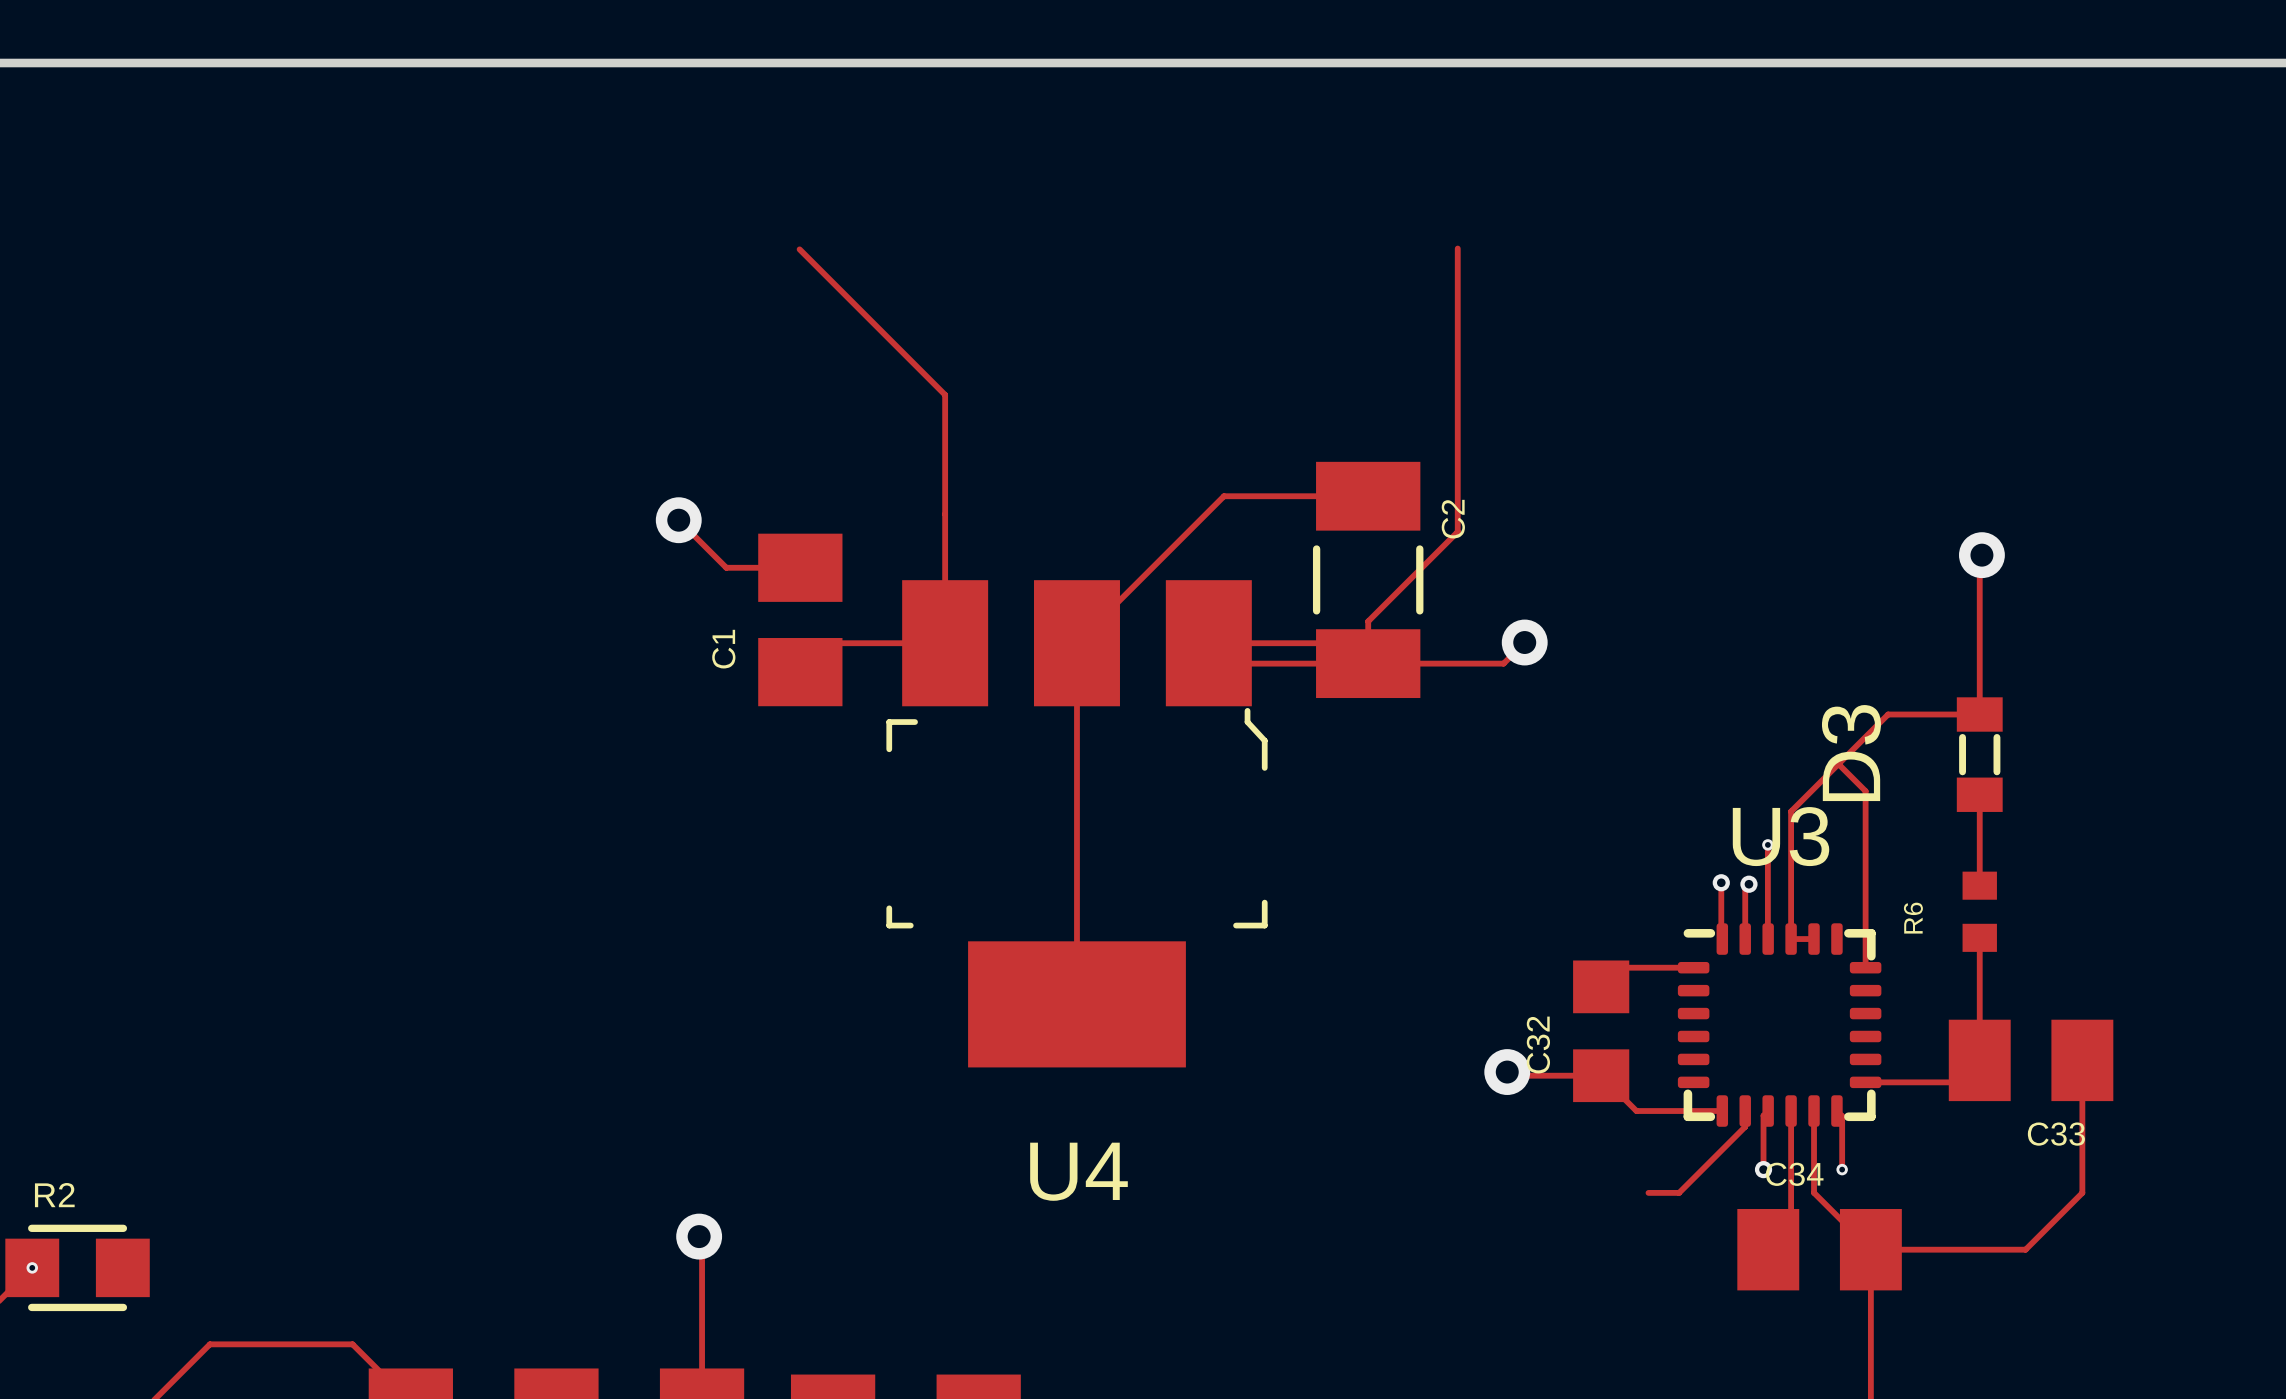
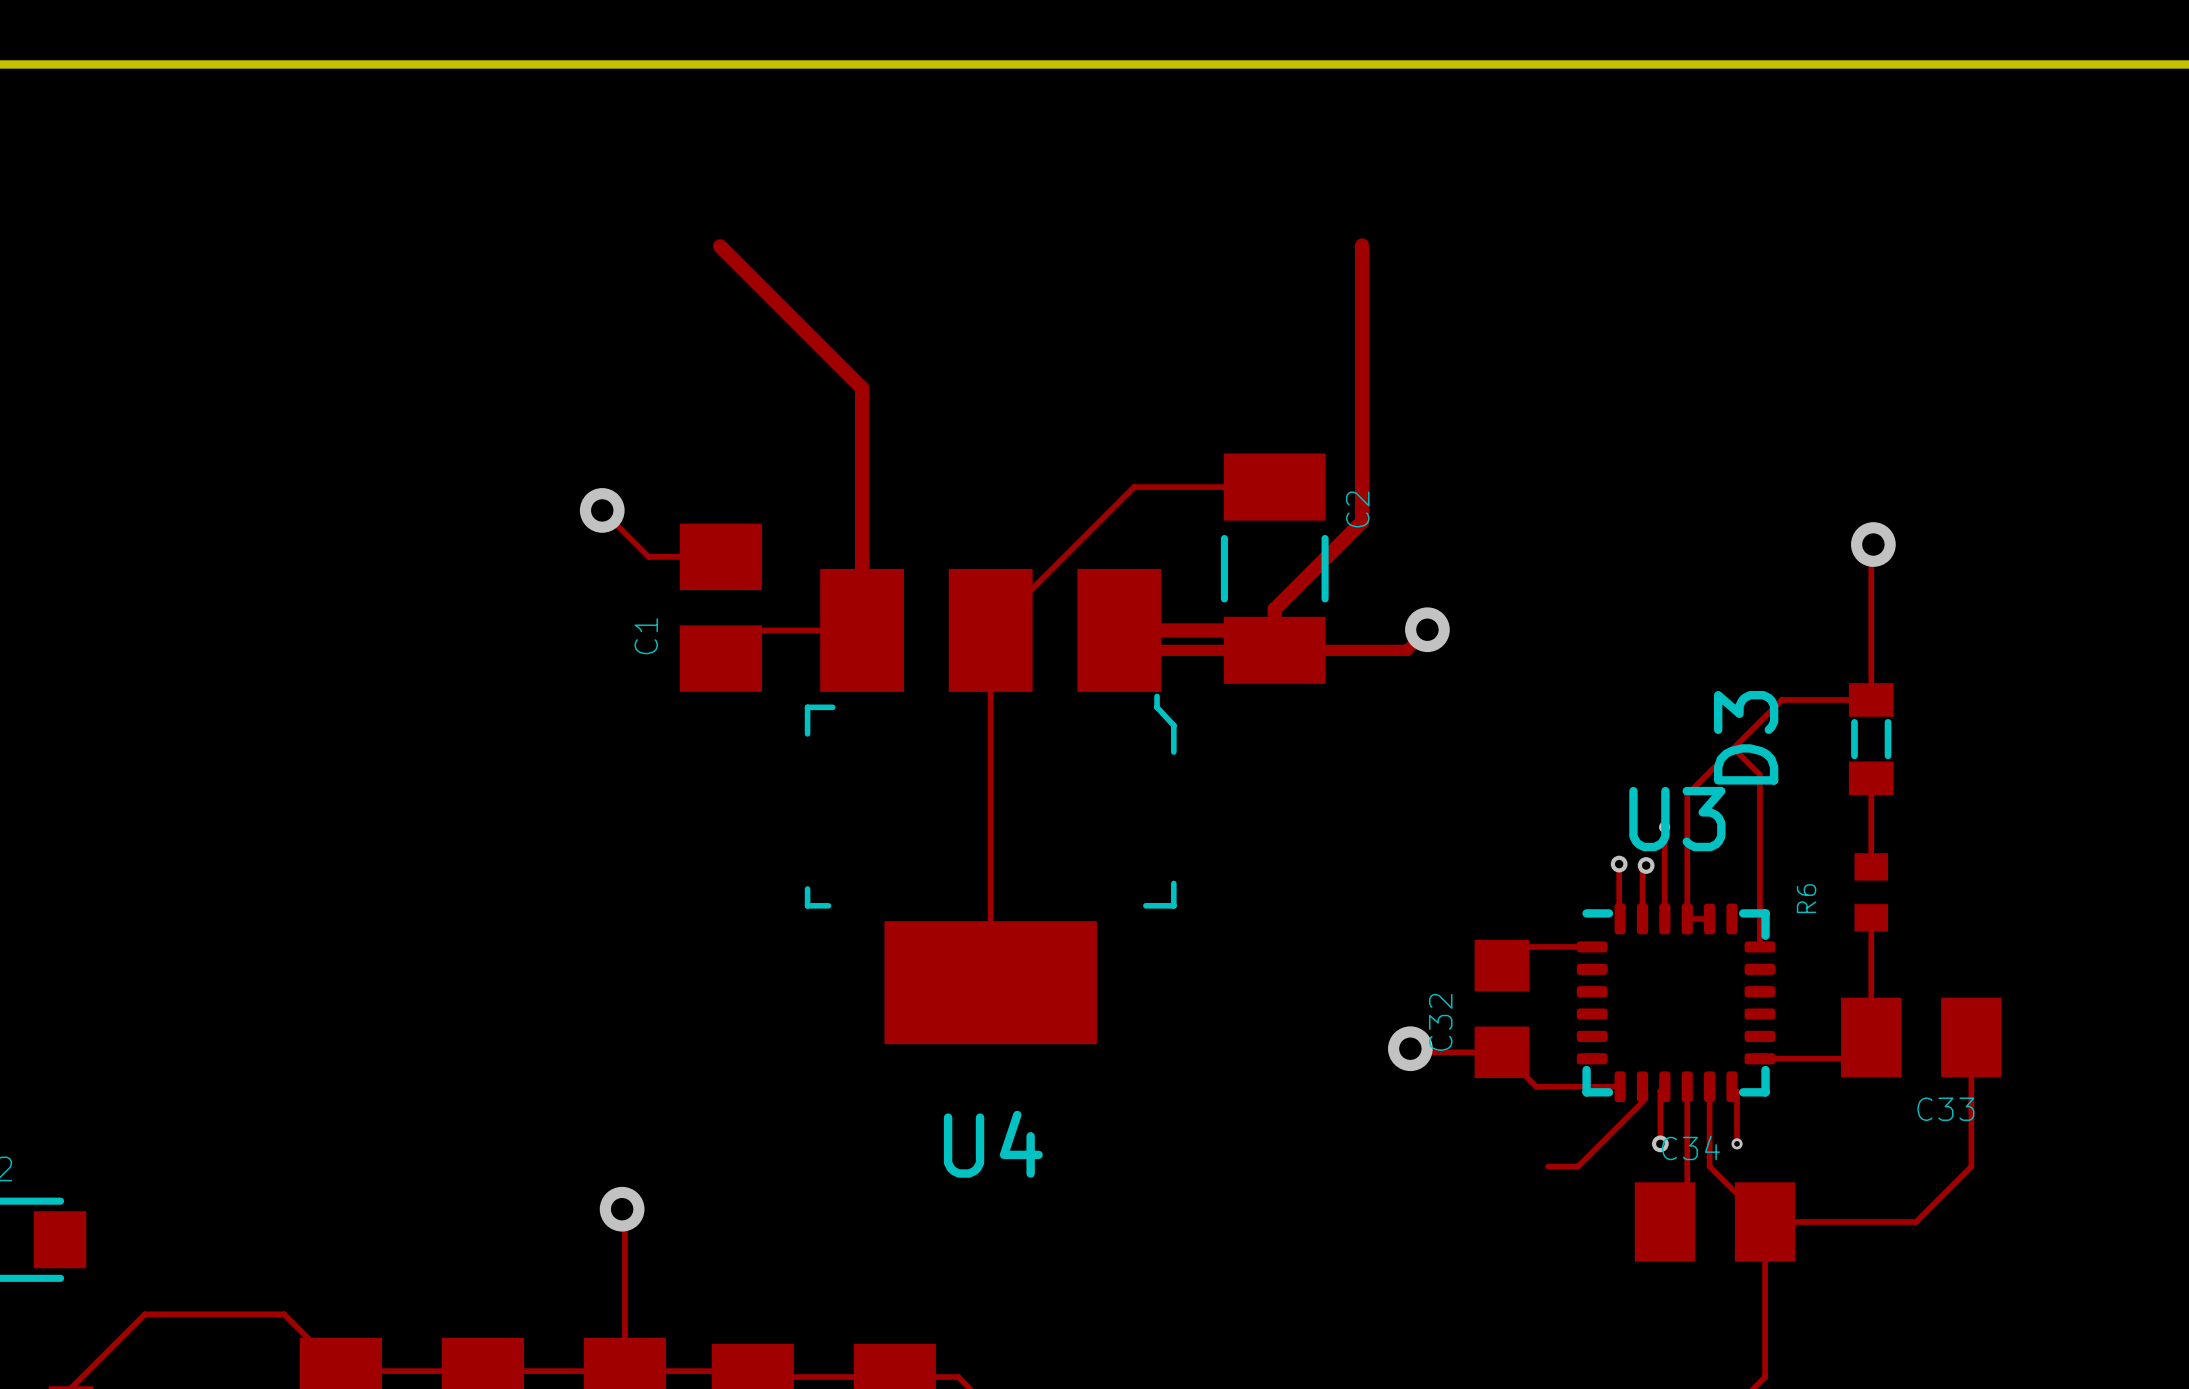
track width: thin (1457, 248) (1457, 531) (1368, 621) (1368, 663) -> thick (1362, 245) (1362, 521) (1274, 609) (1274, 650)
track width: thin (799, 249) (945, 394) (945, 643) -> thick (720, 246) (862, 388) (862, 630)
track width: thin (1524, 642) (1503, 663) (1229, 663) (1208, 643) (1331, 643) -> thick (1427, 629) (1406, 650) (1139, 650) (1119, 630) (1238, 630)

